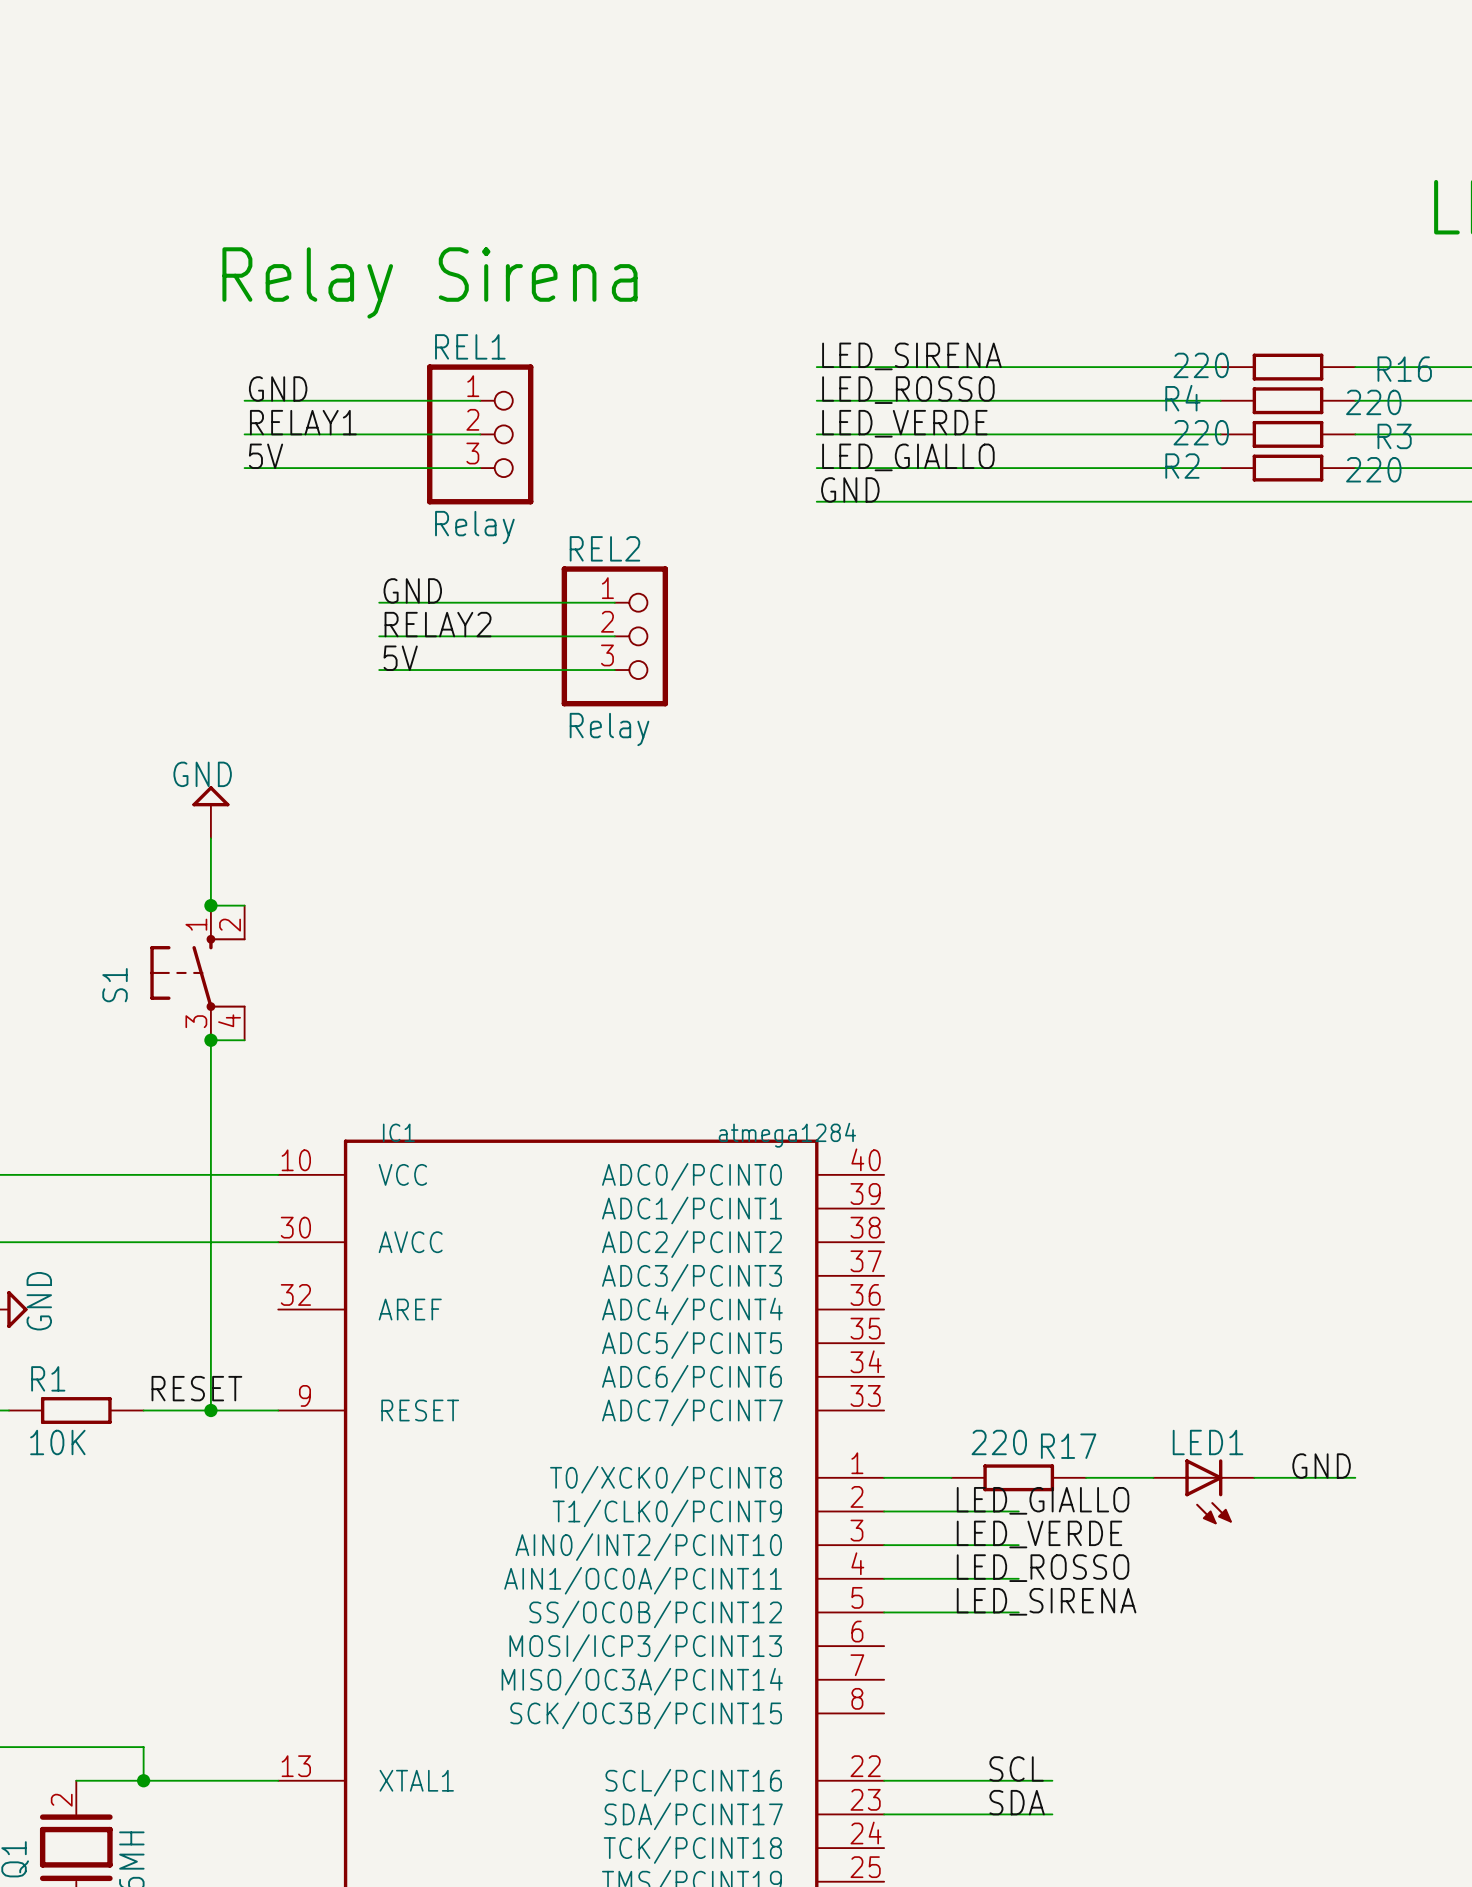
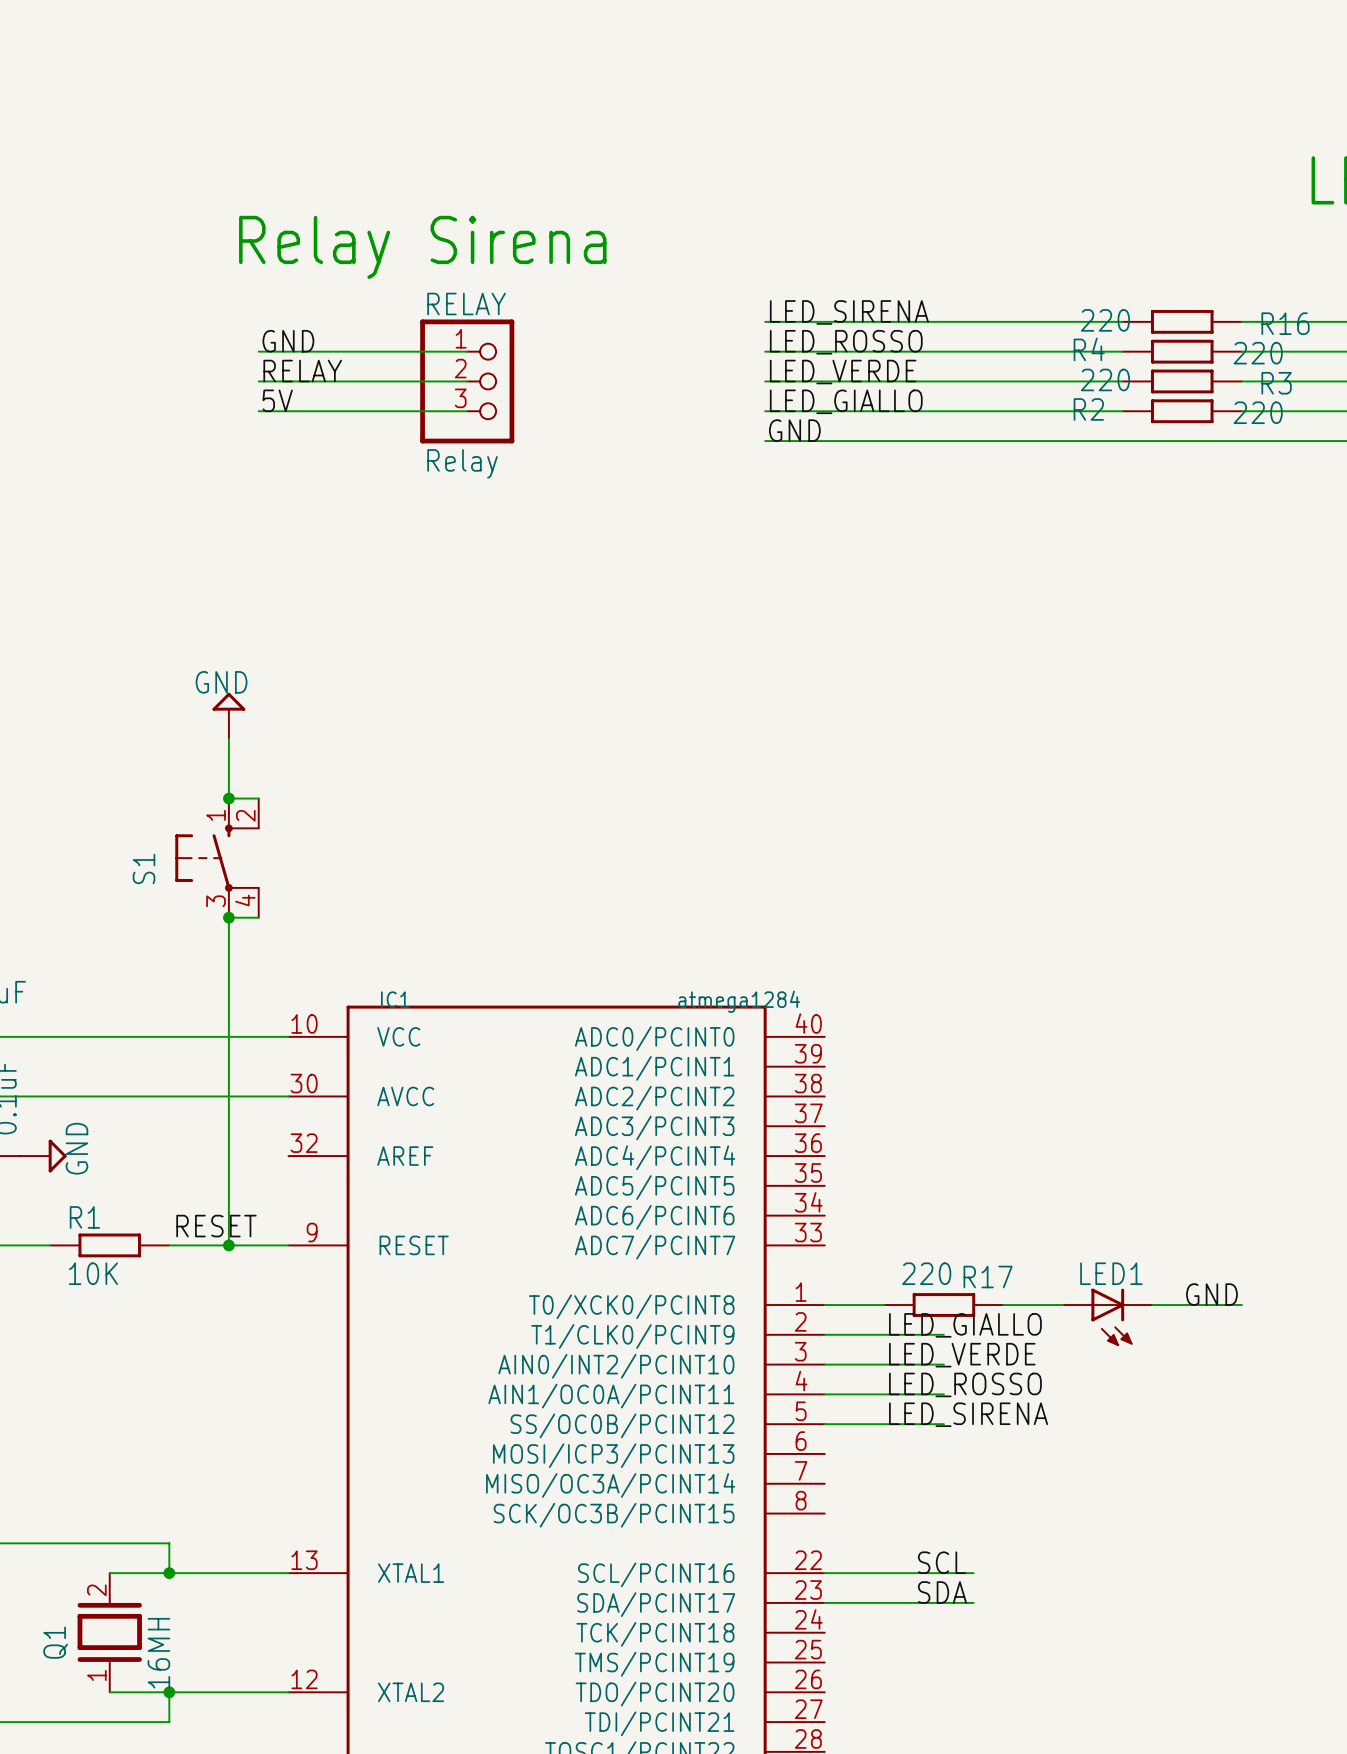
REL1 name: REL1 (470, 346) -> RELAY (466, 304)
label: RELAY1 (303, 422) -> RELAY (302, 371)
label: GND (412, 590) -> none
wire: (379, 602) (614, 602) -> none
label: RELAY2 (438, 624) -> none
wire: (379, 636) (614, 636) -> none
REL2: Relay (614, 636) -> none
label: 5V (400, 658) -> none
wire: (379, 670) (614, 670) -> none

